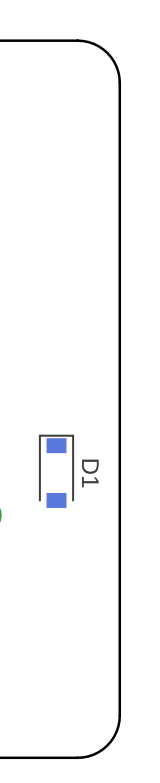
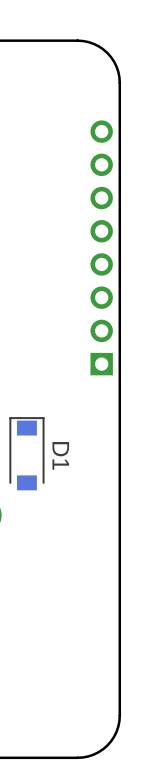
part: none -> (101, 247)
D1 position: (56, 471) -> (26, 453)

